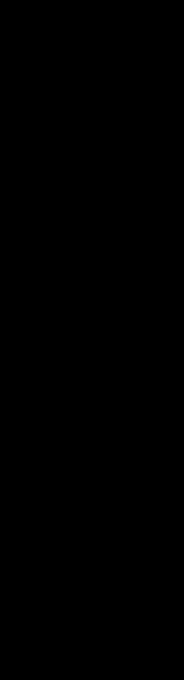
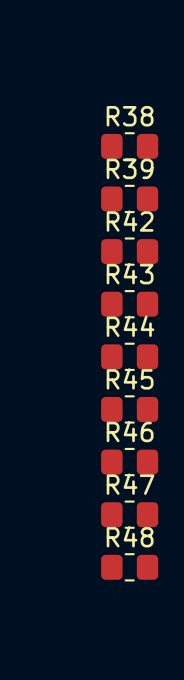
R38: none -> (129, 146)
R39: none -> (129, 198)
R42: none -> (129, 251)
R43: none -> (129, 304)
R44: none -> (129, 356)
R45: none -> (129, 409)
R46: none -> (129, 462)
R47: none -> (129, 514)
R48: none -> (129, 567)

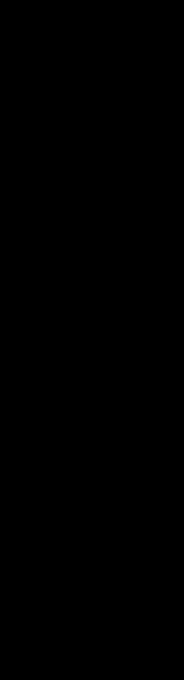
R38: (129, 146) -> none
R39: (129, 198) -> none
R42: (129, 251) -> none
R43: (129, 304) -> none
R44: (129, 356) -> none
R45: (129, 409) -> none
R46: (129, 462) -> none
R47: (129, 514) -> none
R48: (129, 567) -> none

